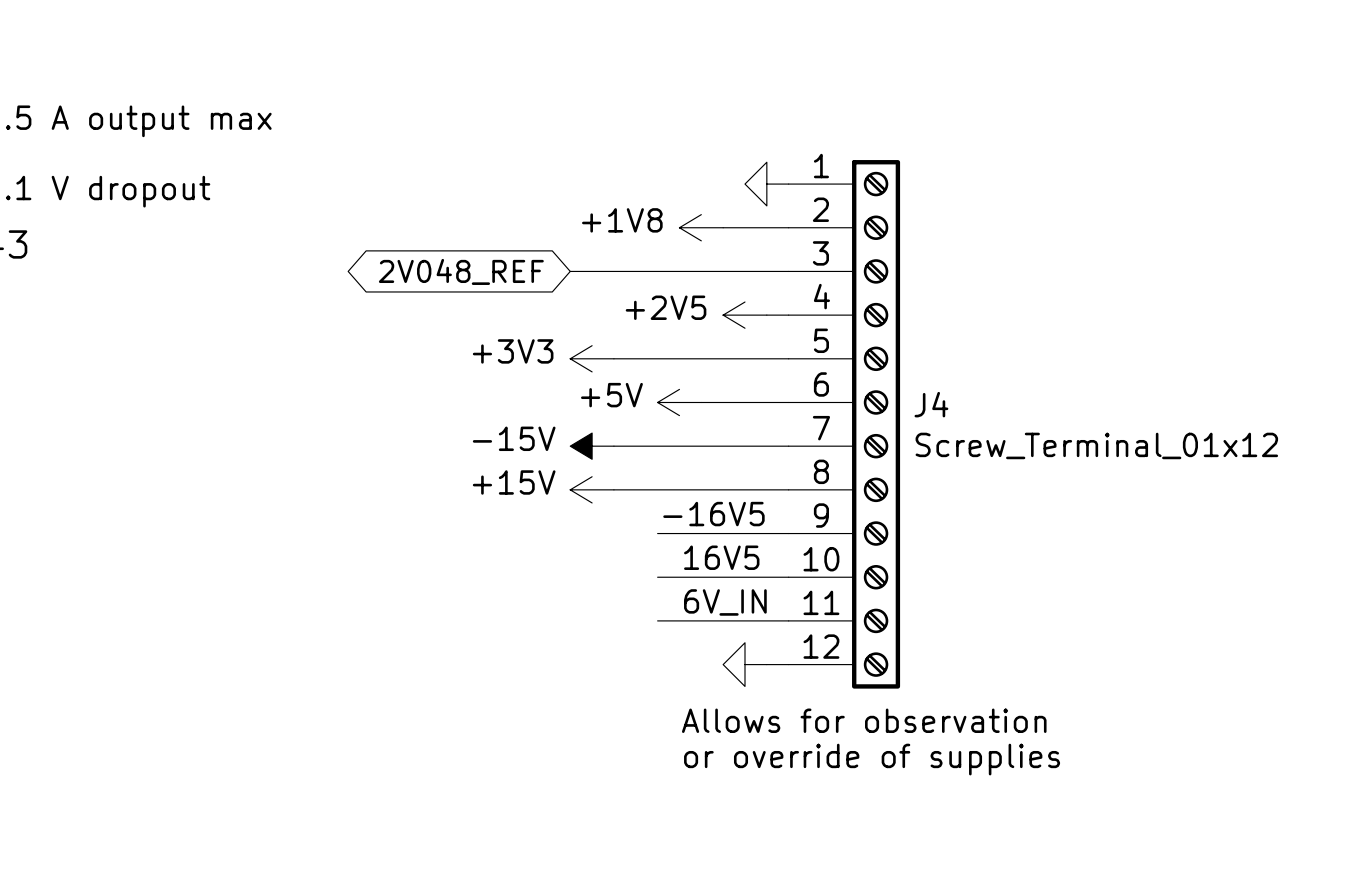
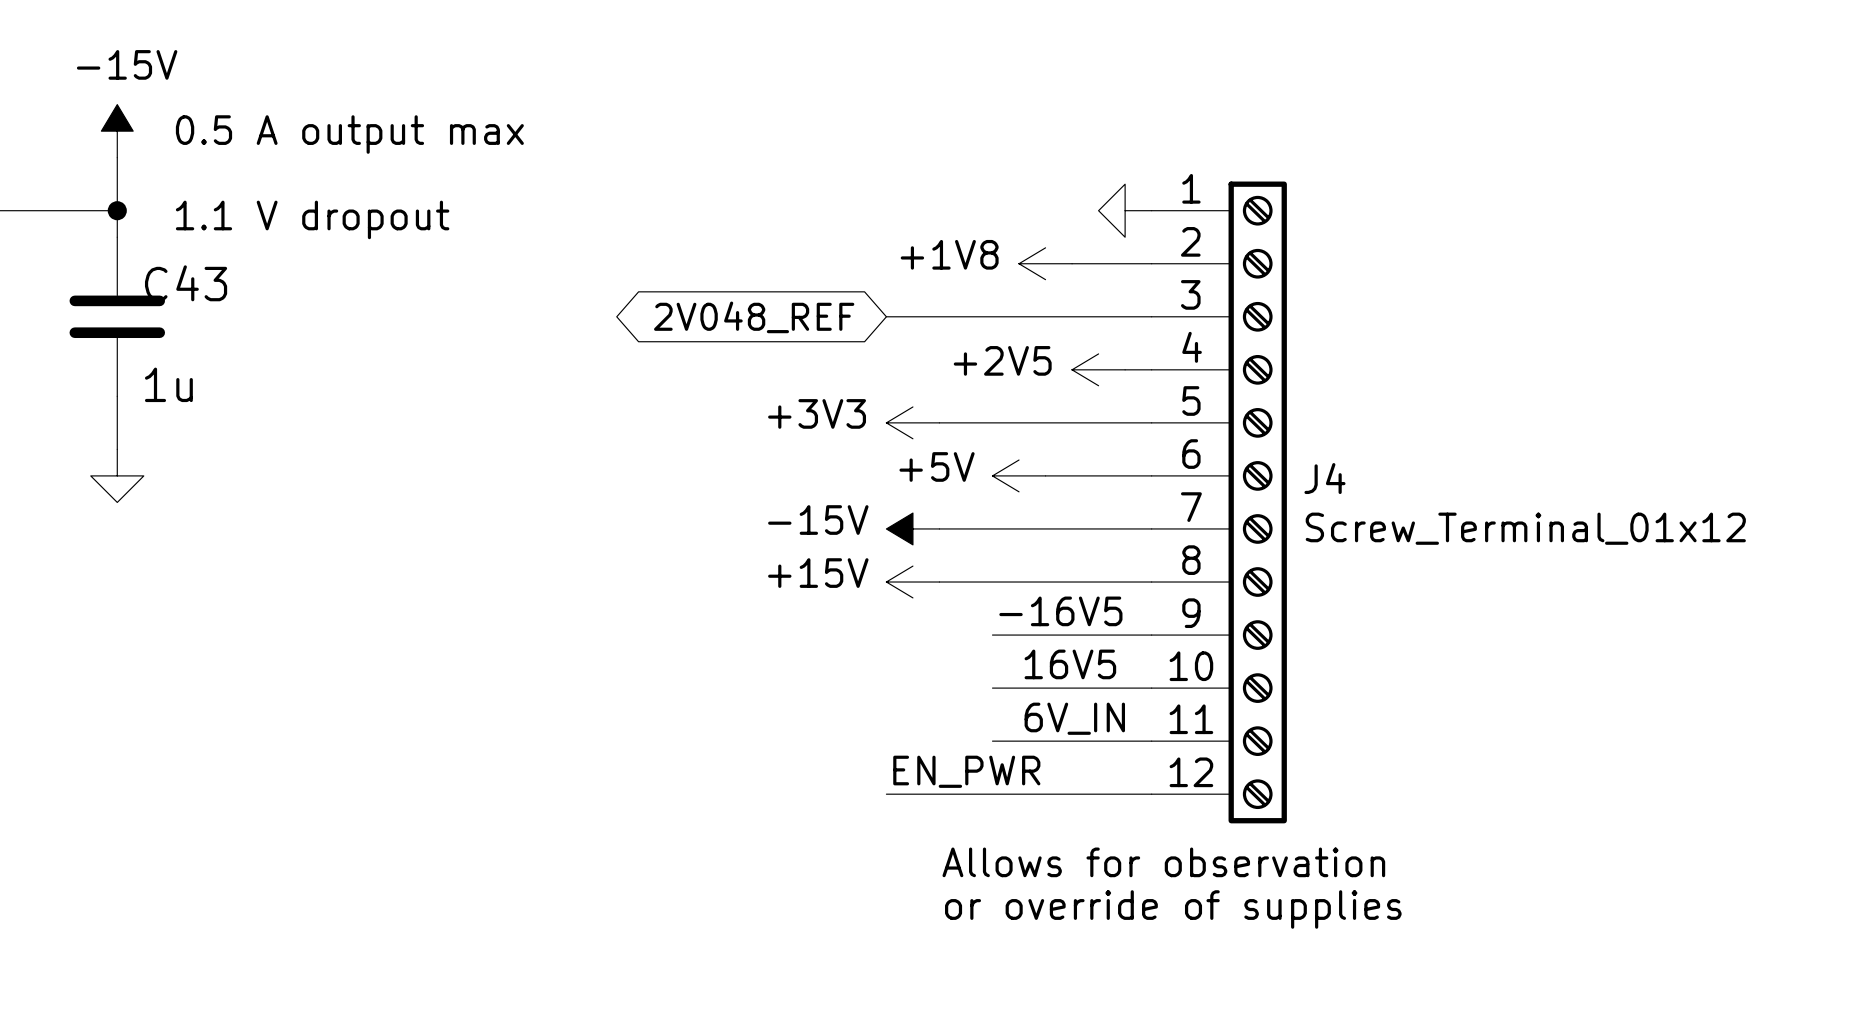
label: none -> EN_PWR (966, 771)
wire: none -> (886, 794) (1125, 794)
power symbol: (744, 664) -> none
text position: Allows for observation (864, 720) -> Allows for observation (1163, 862)
text position: or override of supplies (872, 759) -> or override of supplies (1173, 909)

